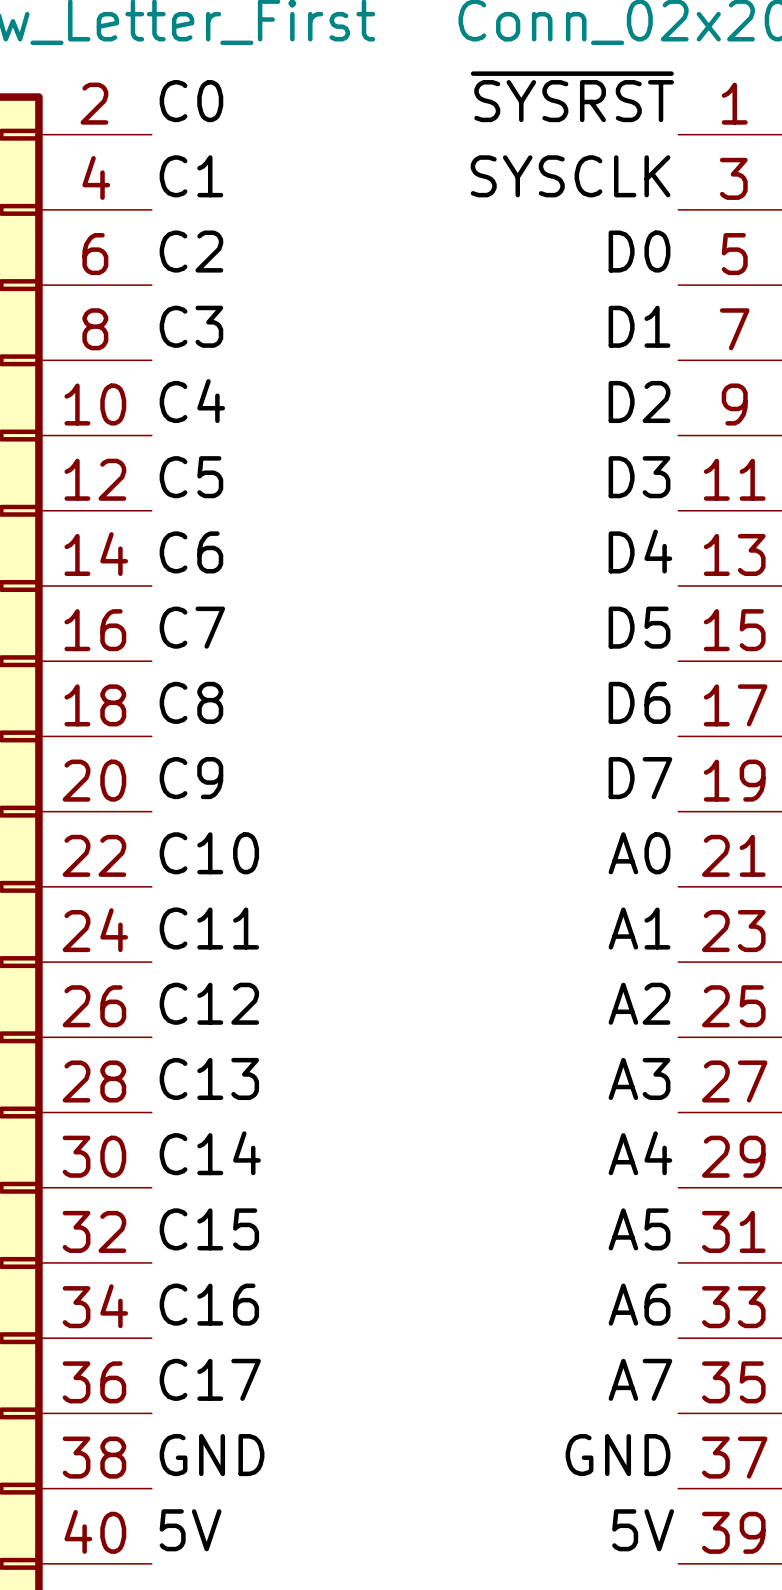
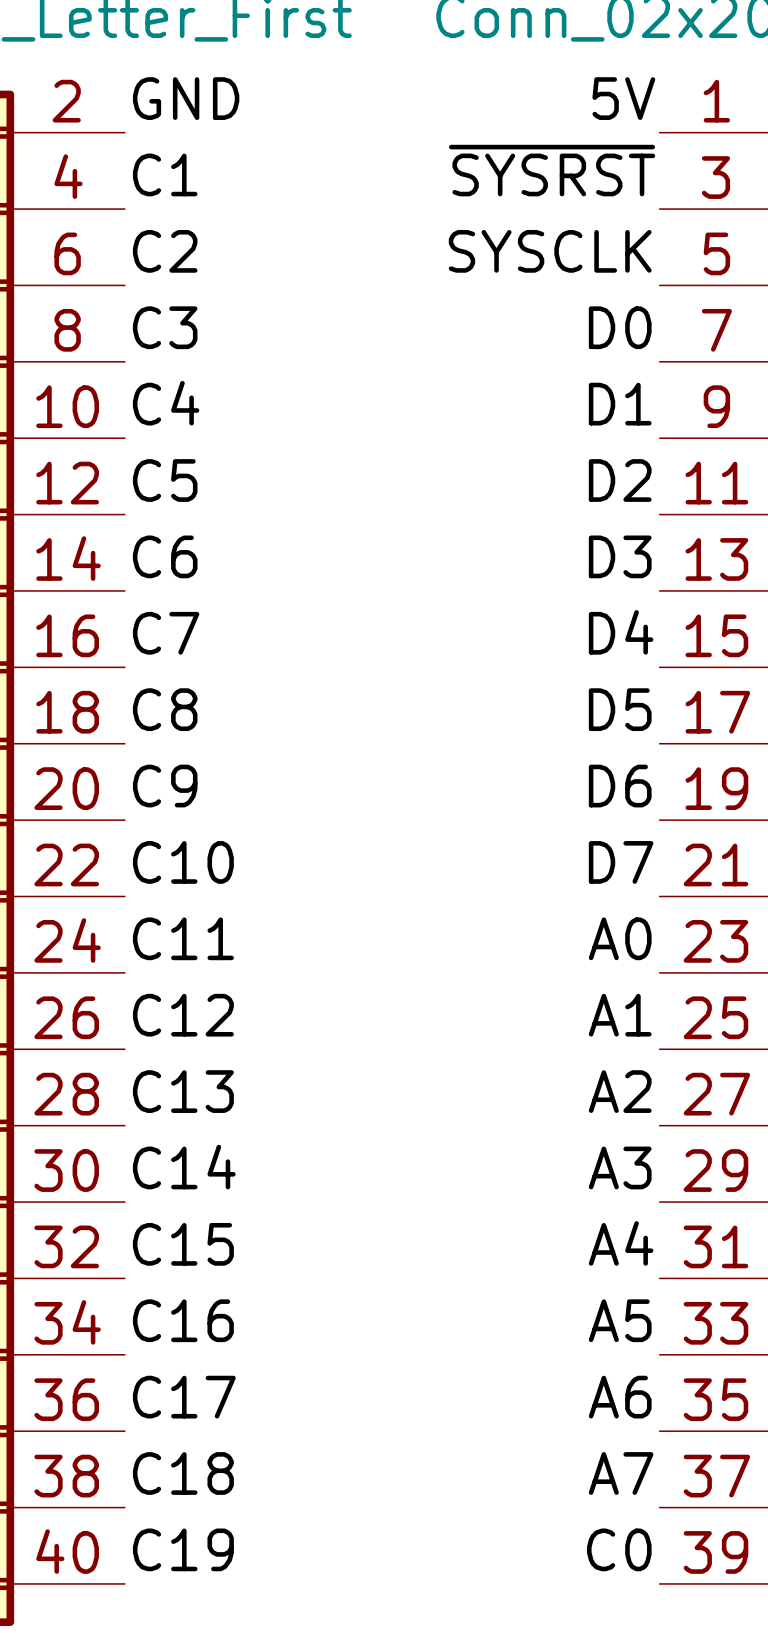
label: ~{SYSRST} (572, 96) -> 5V (623, 98)
label: C0 (191, 101) -> GND (186, 98)
label: SYSCLK (570, 176) -> ~{SYSRST} (552, 170)
label: D0 (639, 251) -> SYSCLK (550, 251)
label: D1 (639, 326) -> D0 (620, 327)
label: D2 (639, 401) -> D1 (620, 404)
label: D3 (639, 477) -> D2 (620, 480)
label: D4 (640, 551) -> D3 (620, 556)
label: D5 (639, 627) -> D4 (621, 632)
label: D6 (639, 702) -> D5 (620, 709)
label: D7 (640, 778) -> D6 (620, 786)
label: A0 (639, 853) -> D7 (621, 862)
label: A1 (639, 928) -> A0 (620, 938)
label: A2 (639, 1003) -> A1 (620, 1015)
label: A3 (639, 1078) -> A2 (620, 1091)
label: A4 (640, 1153) -> A3 (620, 1167)
label: A5 (639, 1229) -> A4 (621, 1243)
label: A6 (639, 1304) -> A5 (620, 1320)
label: A7 (640, 1379) -> A6 (620, 1397)
label: GND (212, 1455) -> C18 (183, 1473)
label: GND (618, 1455) -> A7 (621, 1473)
label: 5V (190, 1530) -> C19 (183, 1549)
label: 5V (643, 1530) -> C0 (619, 1549)

